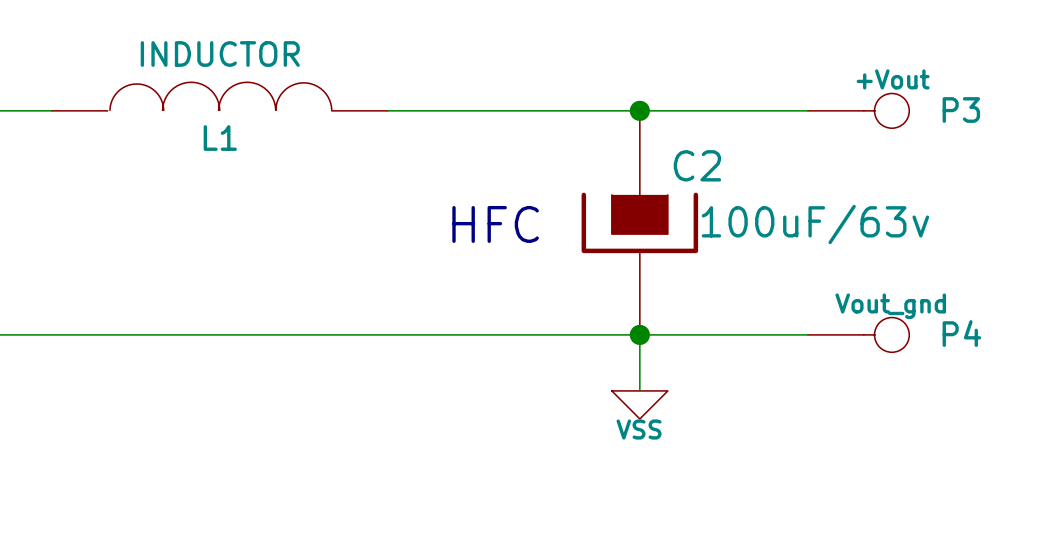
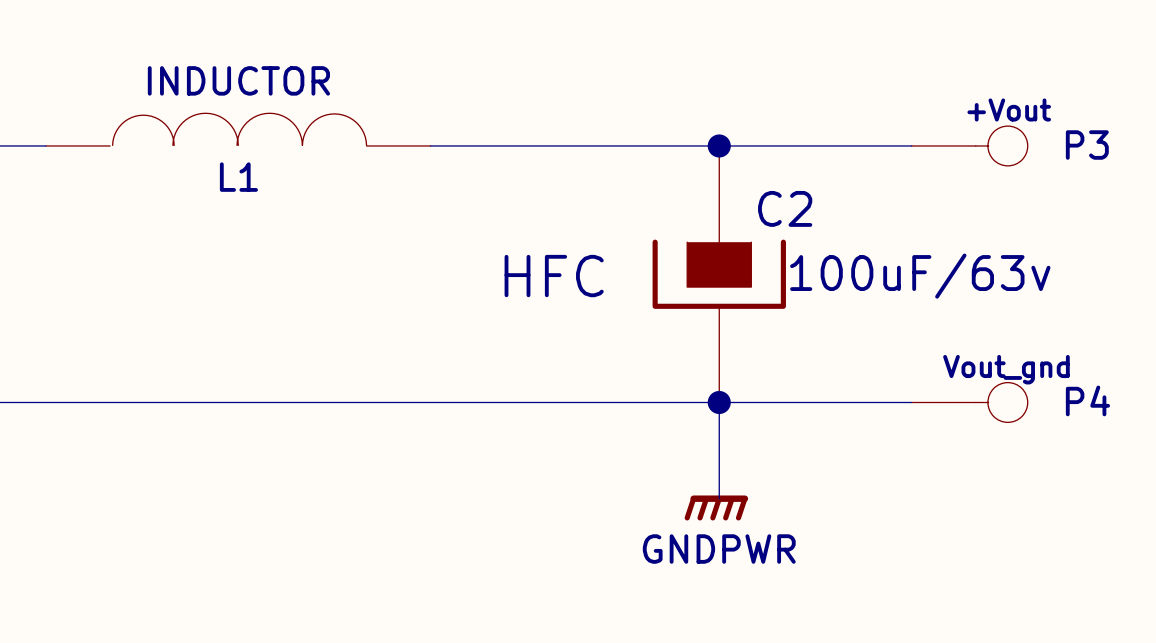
wire: none -> (719, 466) (719, 498)
power symbol: VSS (639, 404) -> none
power symbol: none -> GNDPWR (716, 507)

